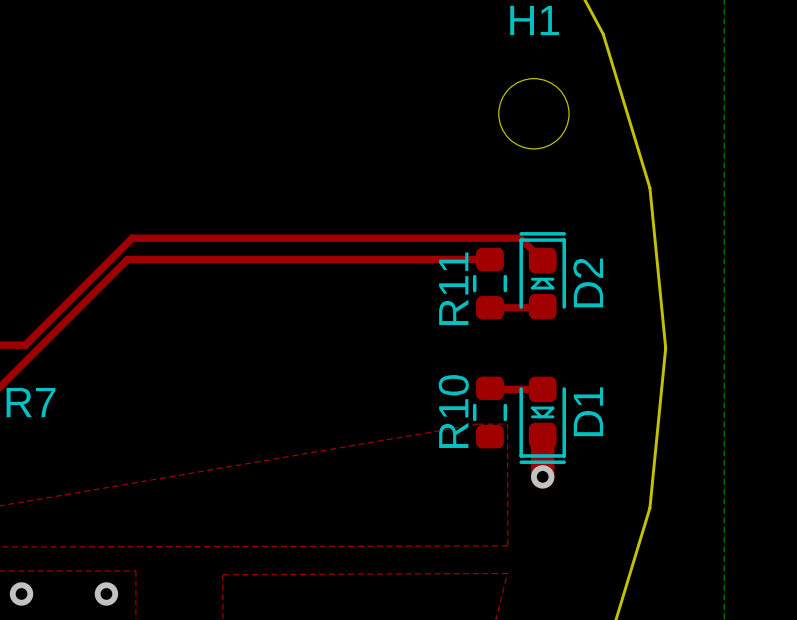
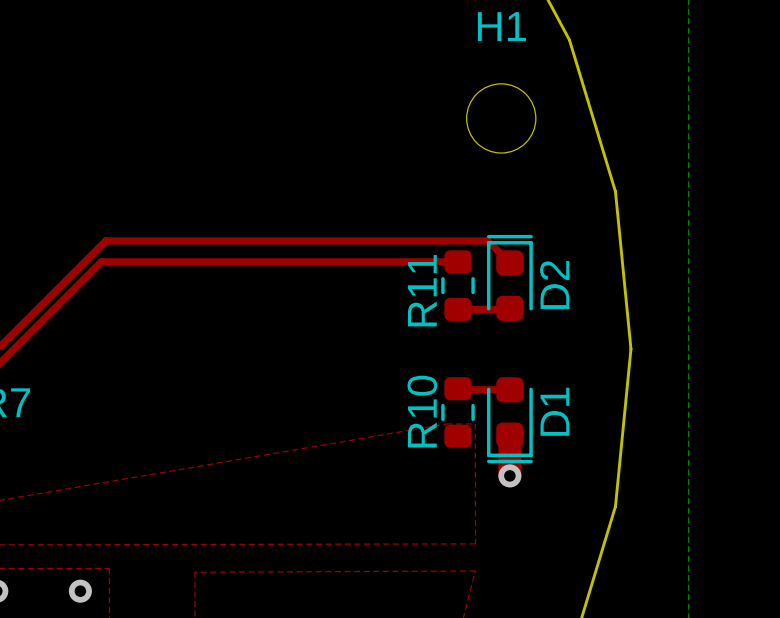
D2 footprint: [519, 232, 566, 320] -> [486, 234, 533, 321]
D1 footprint: [519, 376, 566, 464] -> [486, 377, 533, 464]

